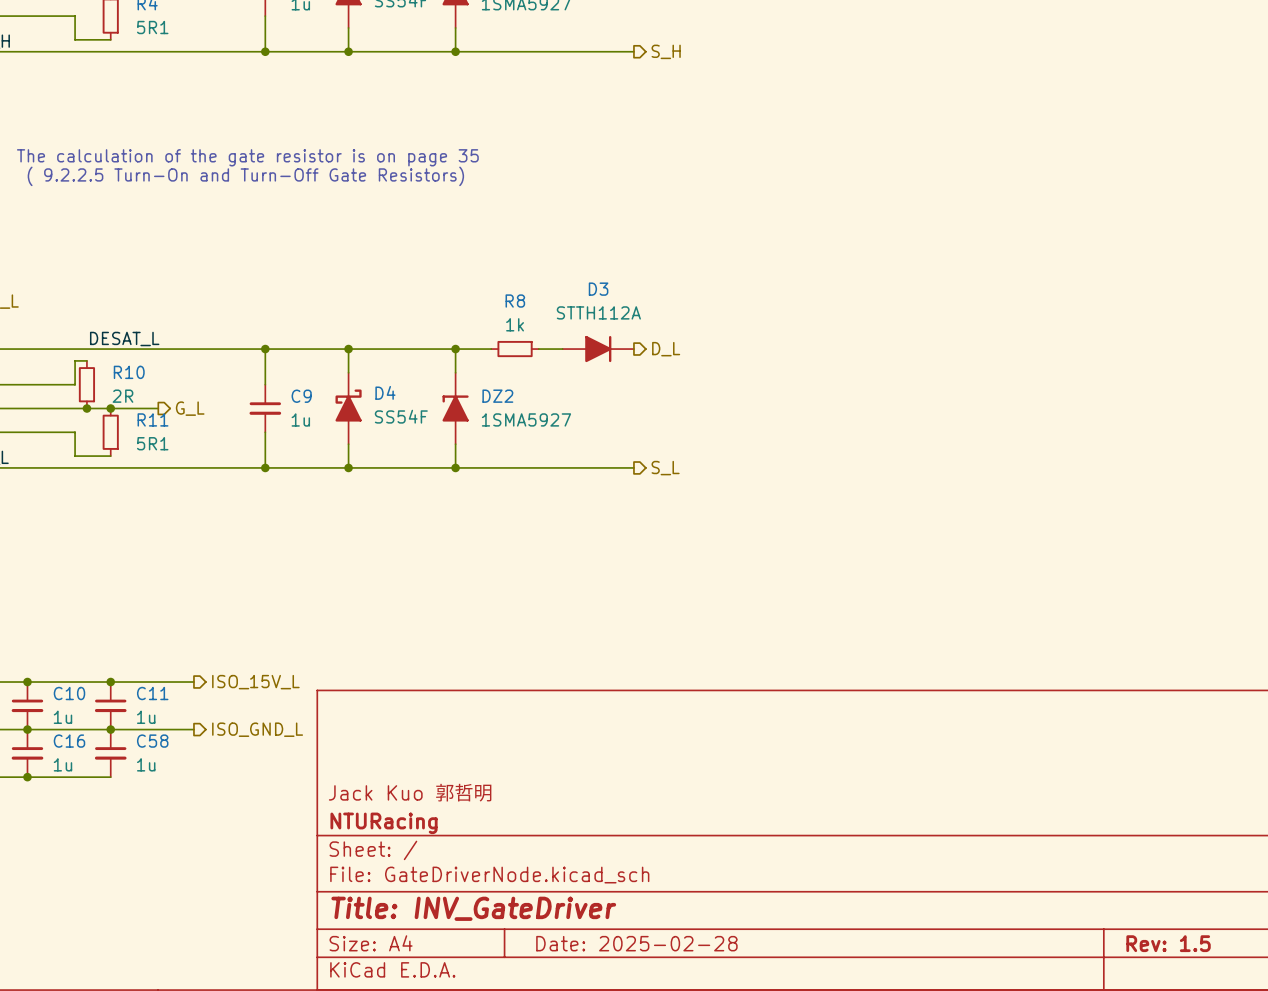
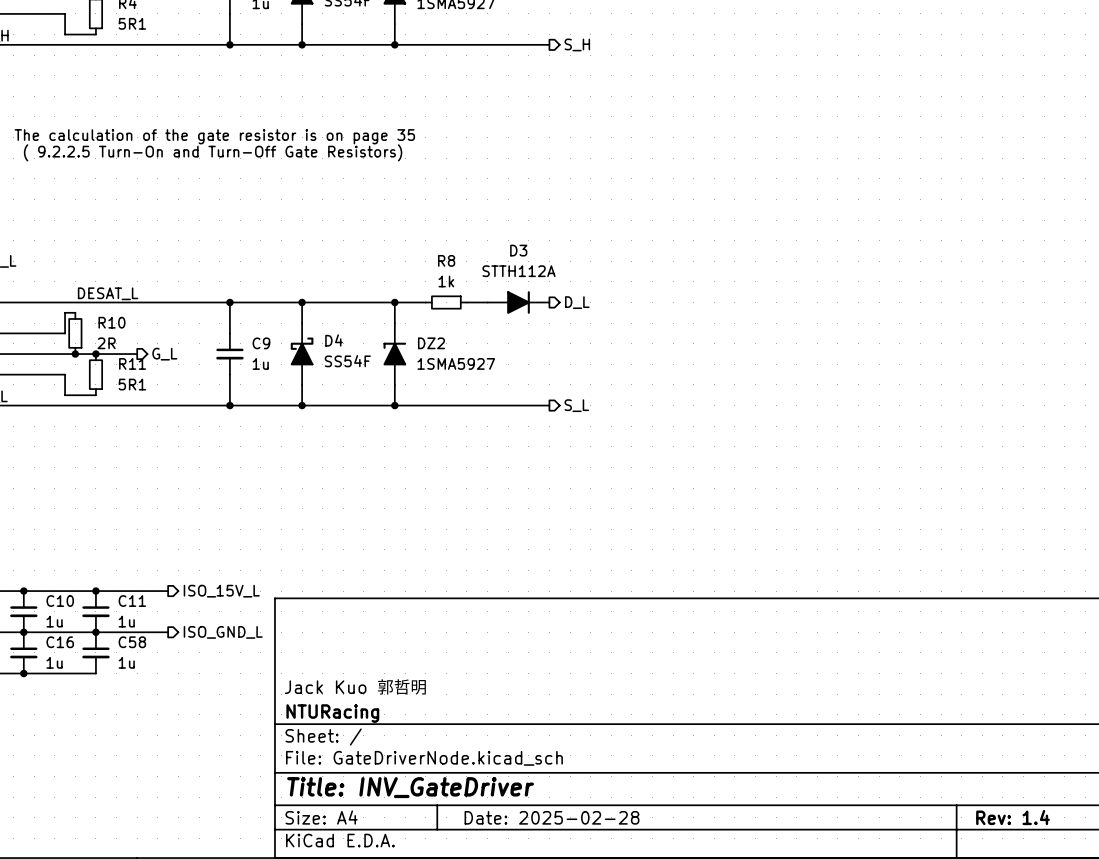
title block: Rev: 1.5 (1168, 943) -> Rev: 1.4 (1013, 817)

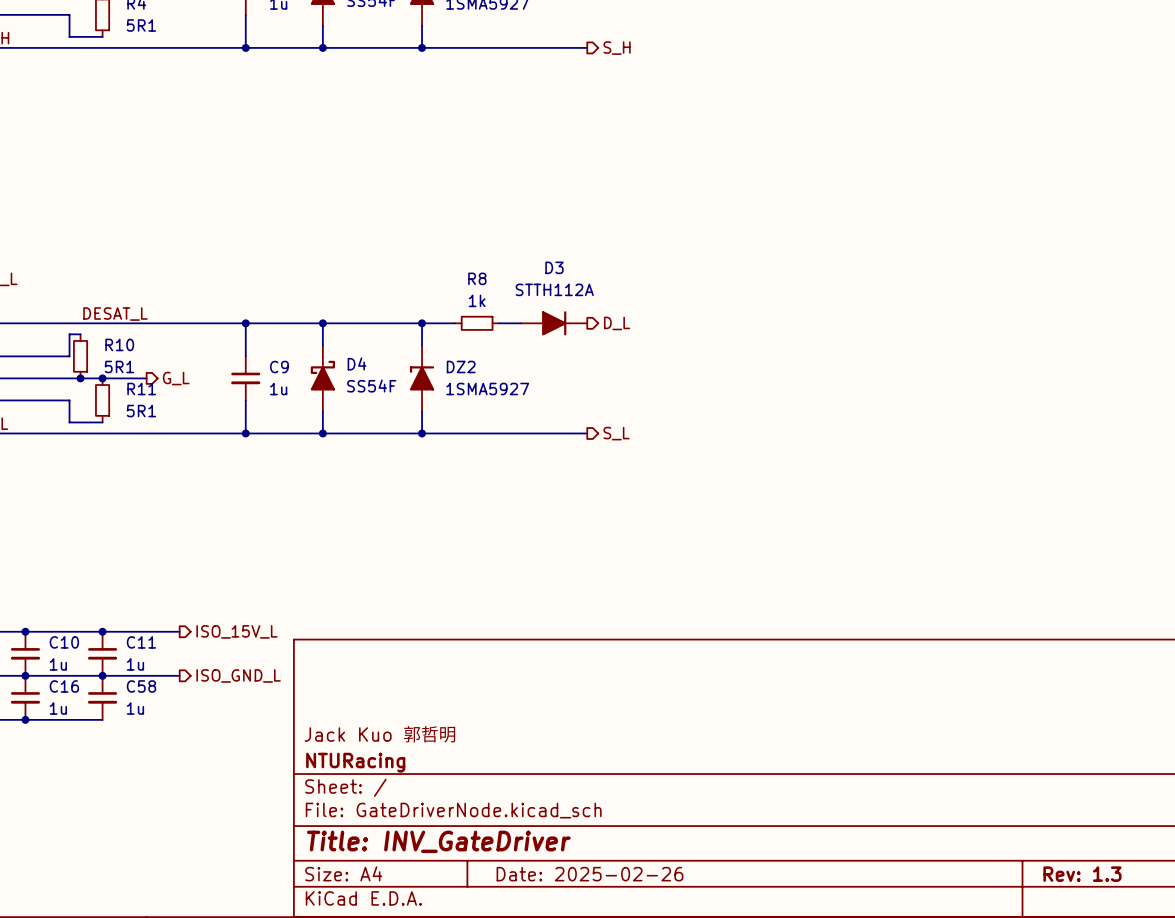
text: The calculation of the gate resistor is on page 35 (214, 136) -> none
text: ( 9.2.2.5 Turn-On and Turn-Off Gate Resistors) (213, 152) -> none
R10 value: 2R (106, 343) -> 5R1 (119, 366)
title block: Date: 2025-02-28 (551, 817) -> Date: 2025-02-26 (590, 874)
title block: Rev: 1.4 (1013, 817) -> Rev: 1.3 (1082, 874)

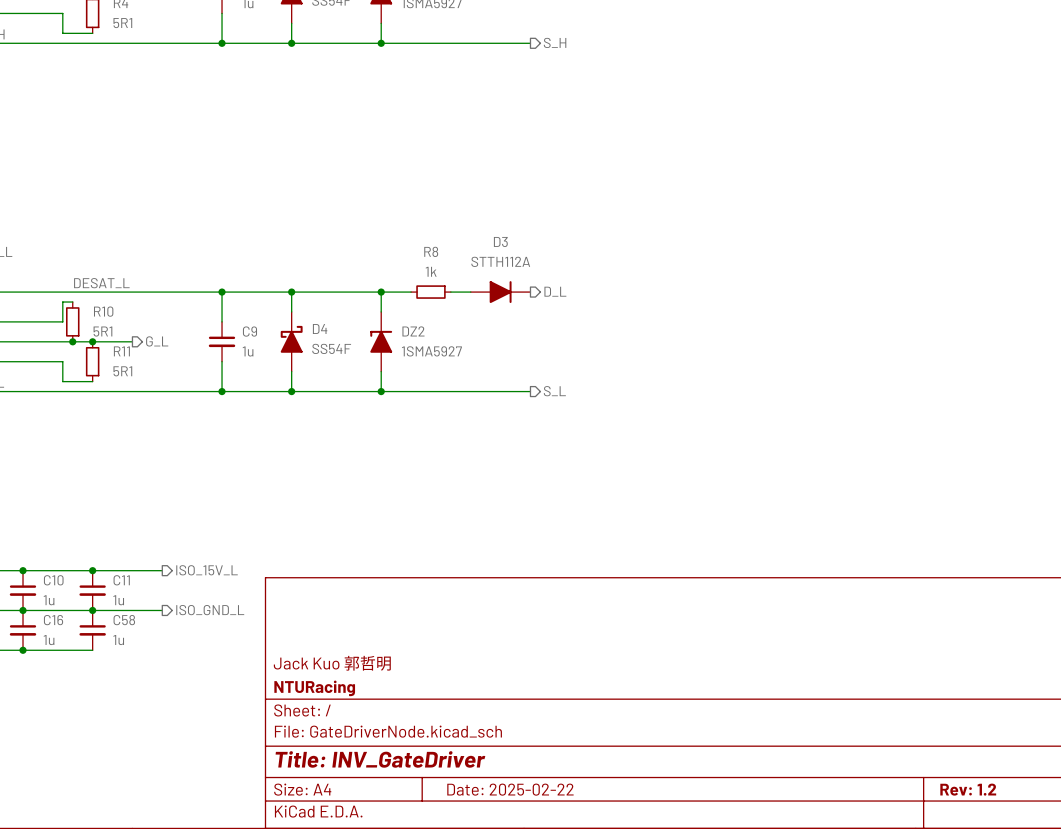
title block: Date: 2025-02-26 (590, 874) -> Date: 2025-02-22 (510, 789)
title block: Rev: 1.3 (1082, 874) -> Rev: 1.2 (968, 789)

